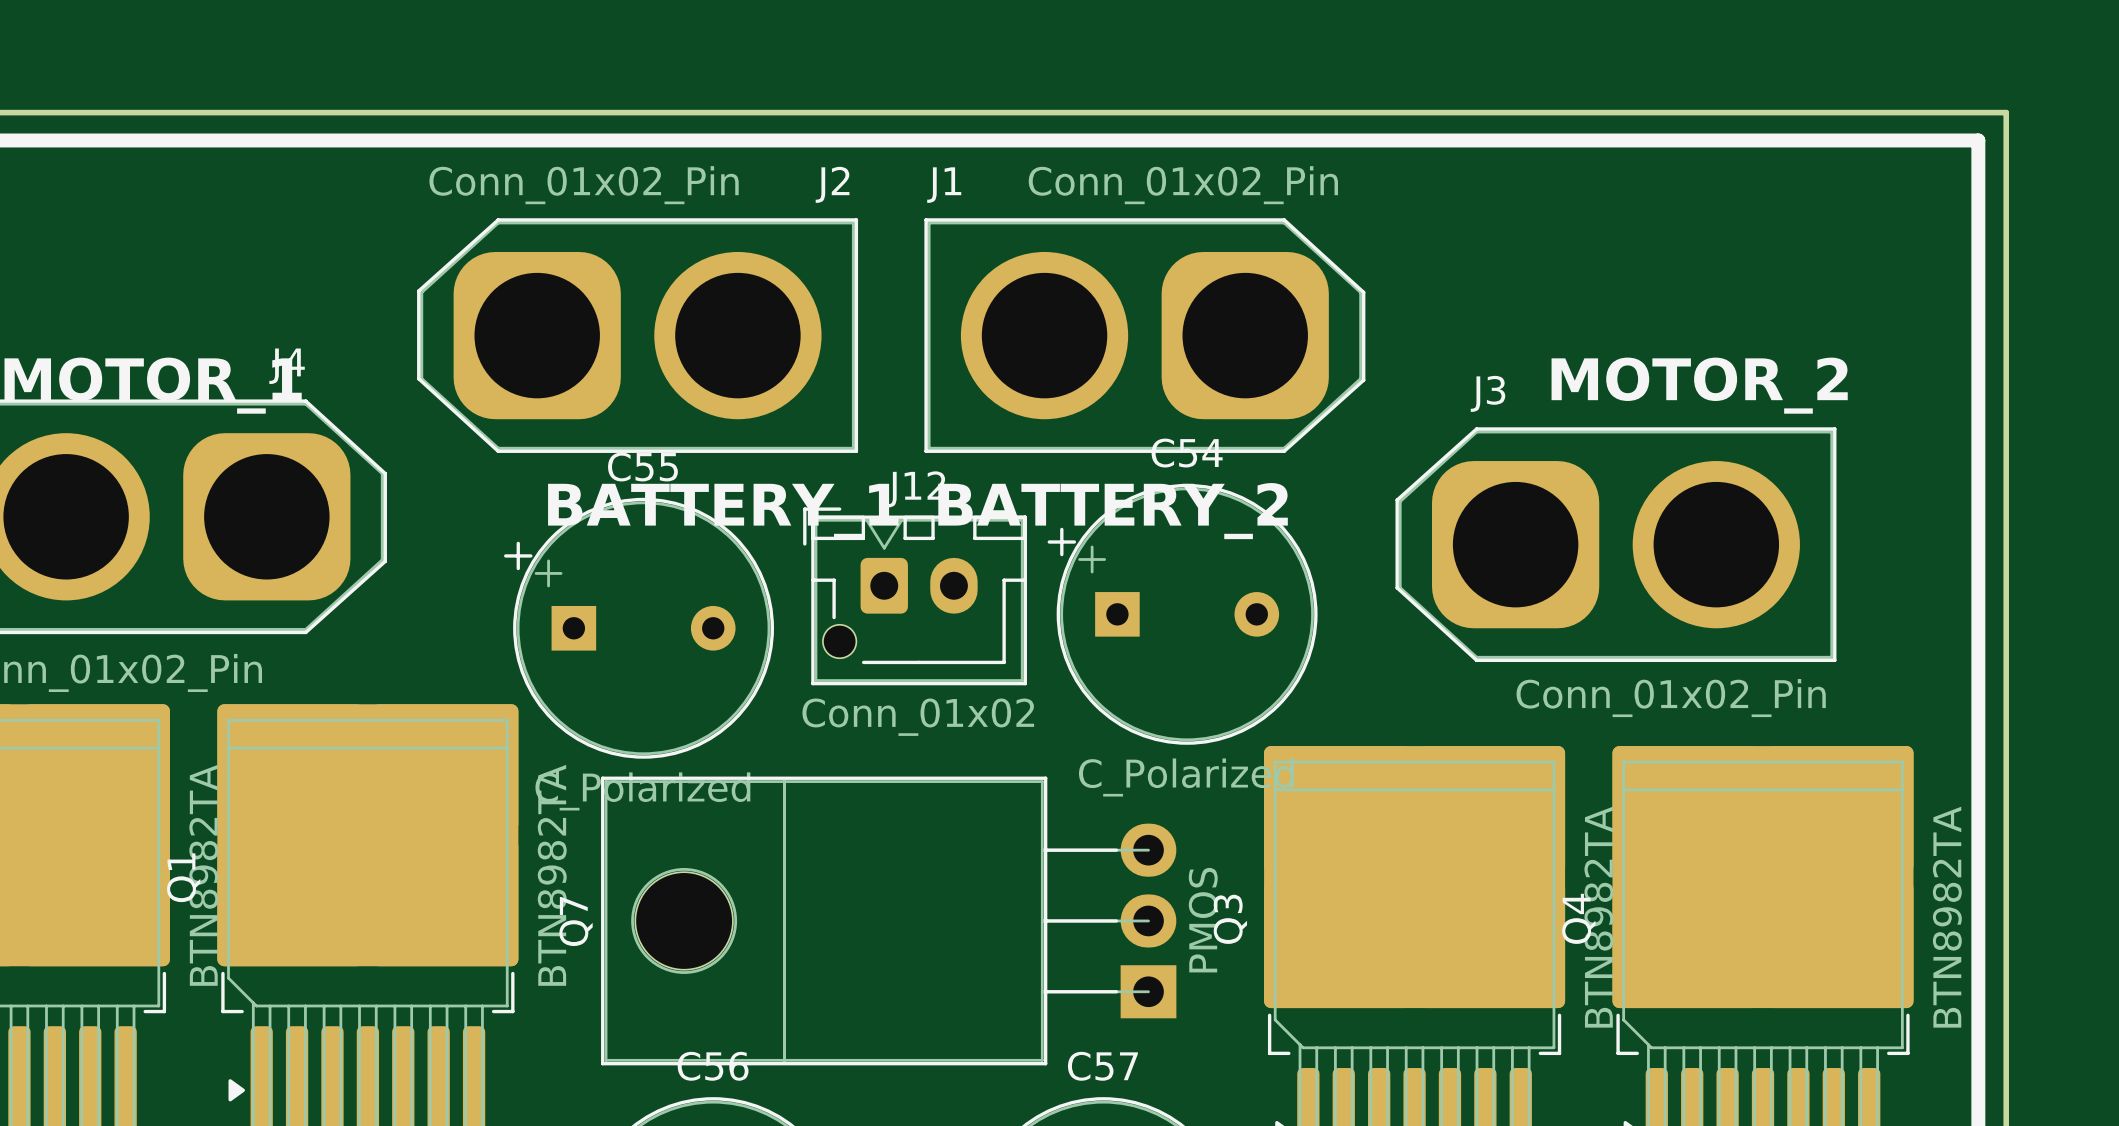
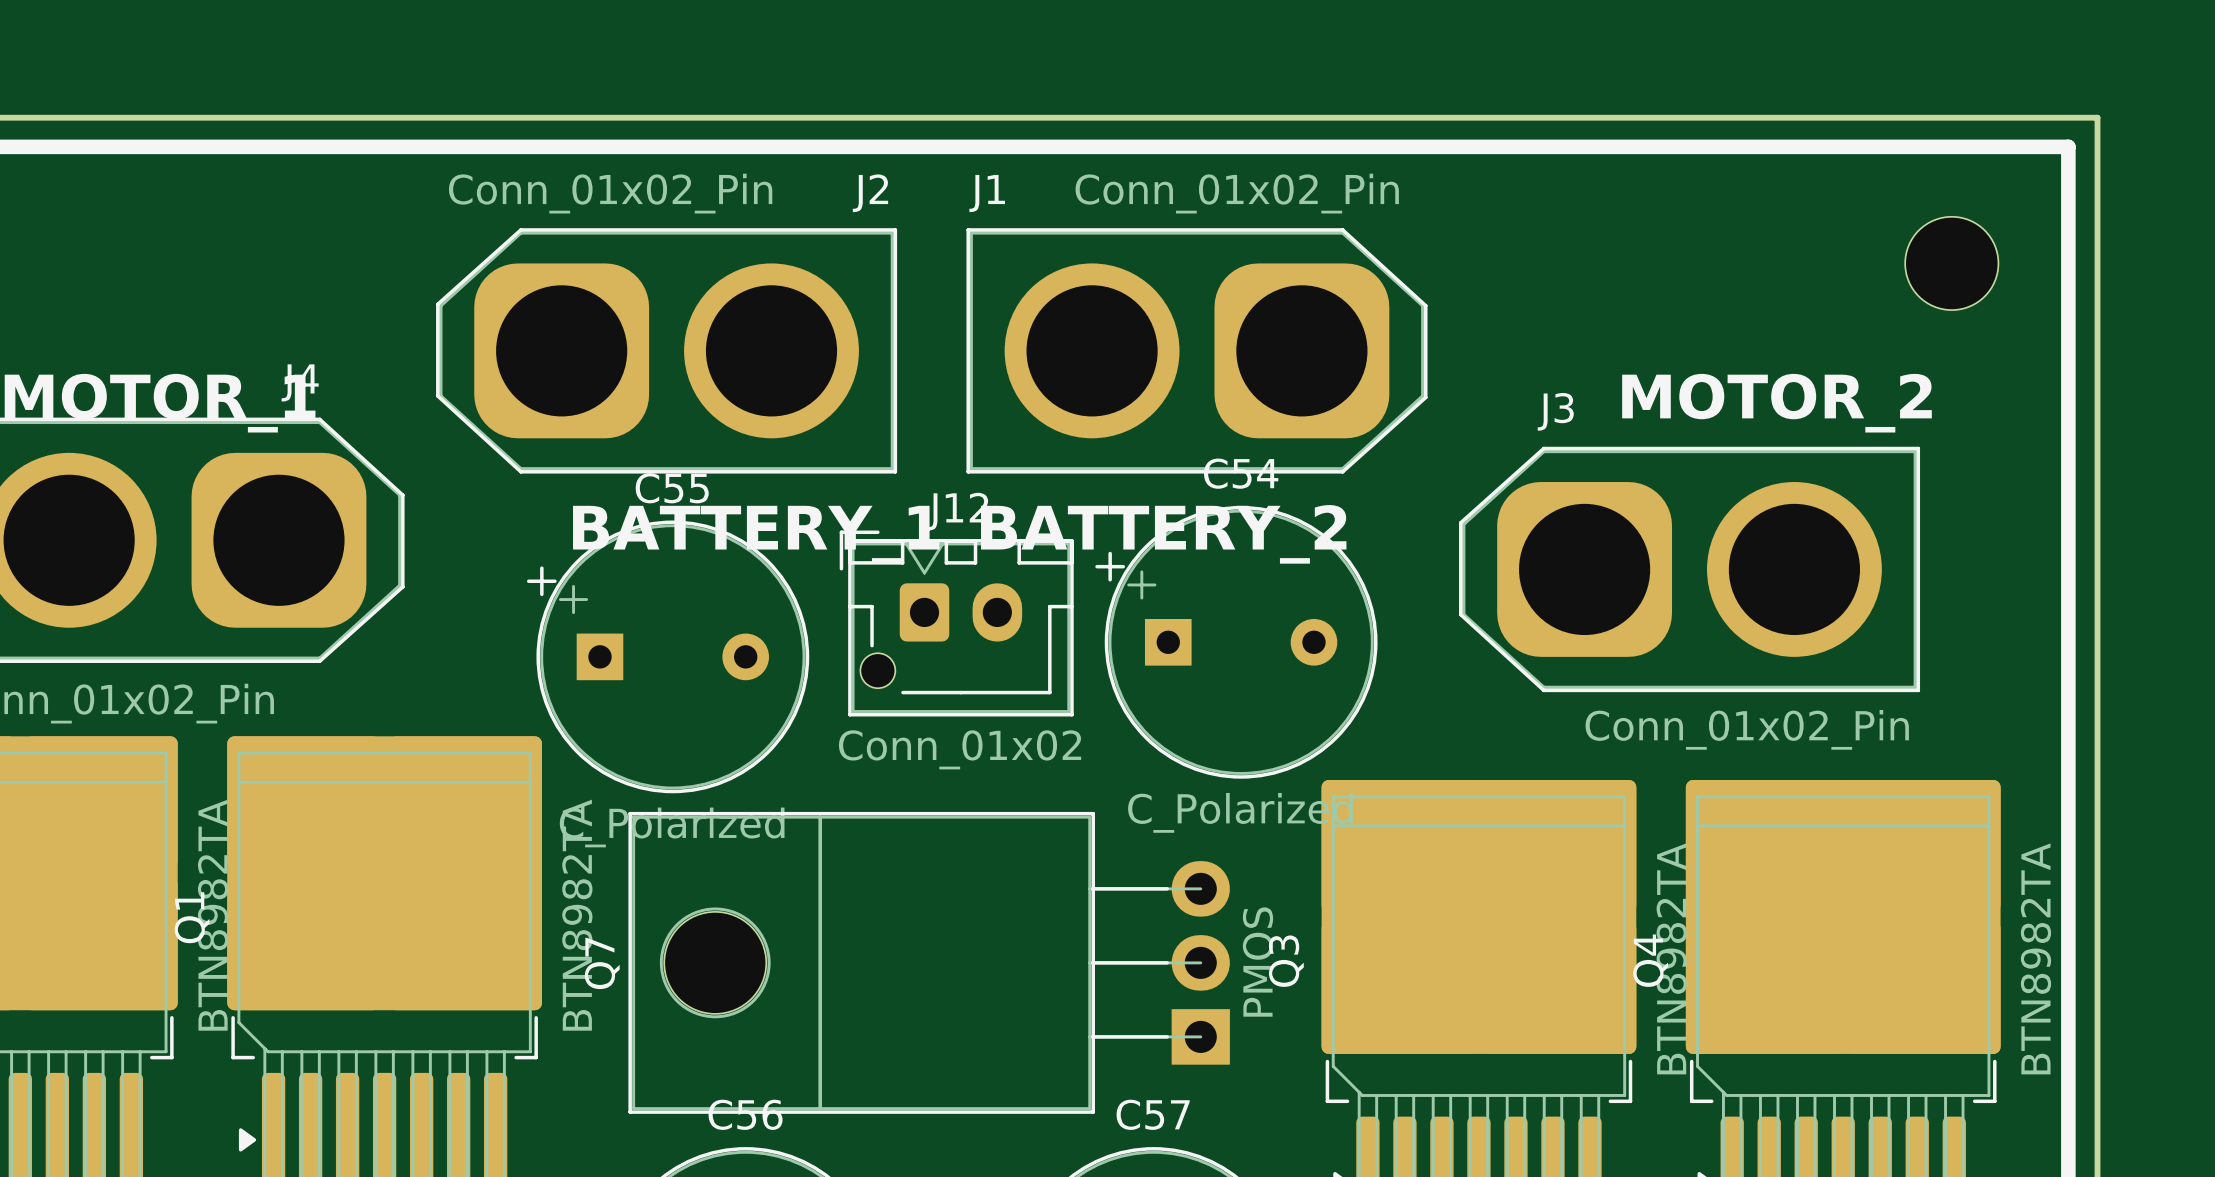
part: none -> (1951, 263)

